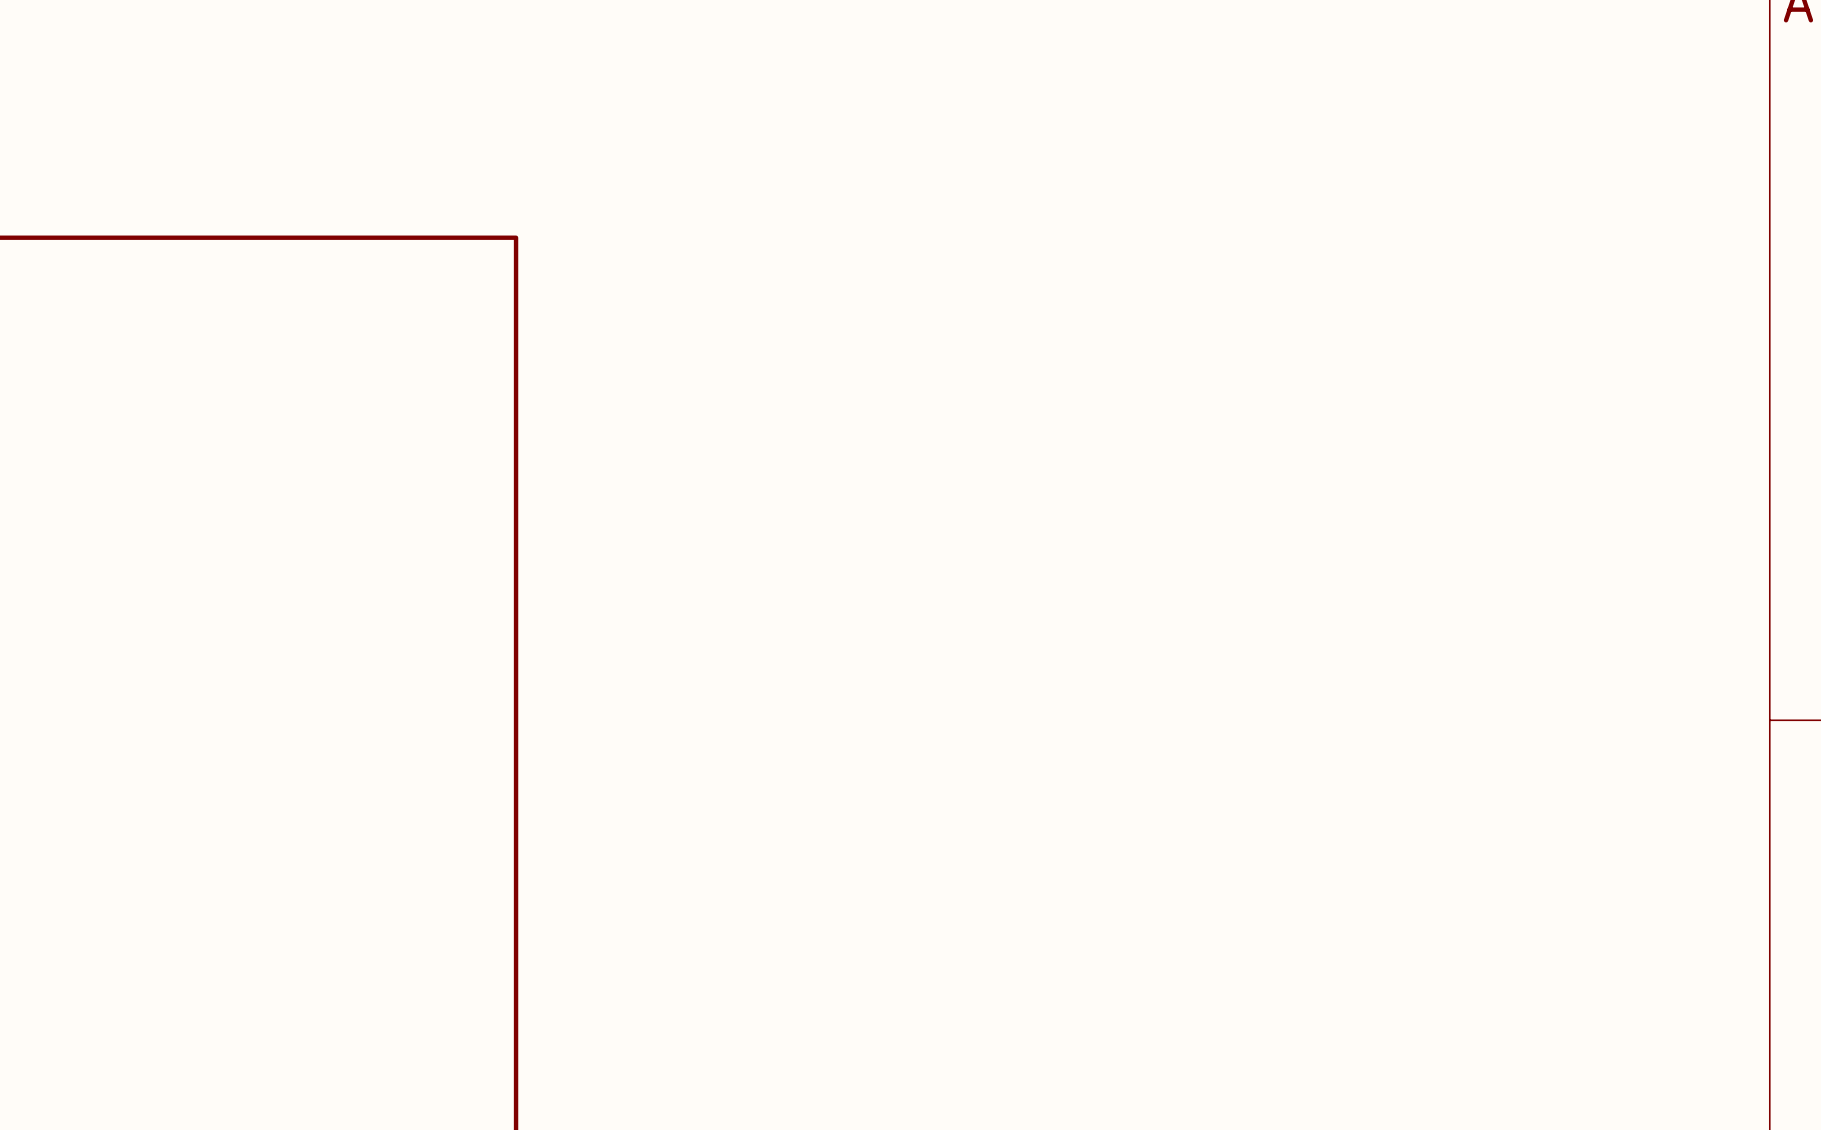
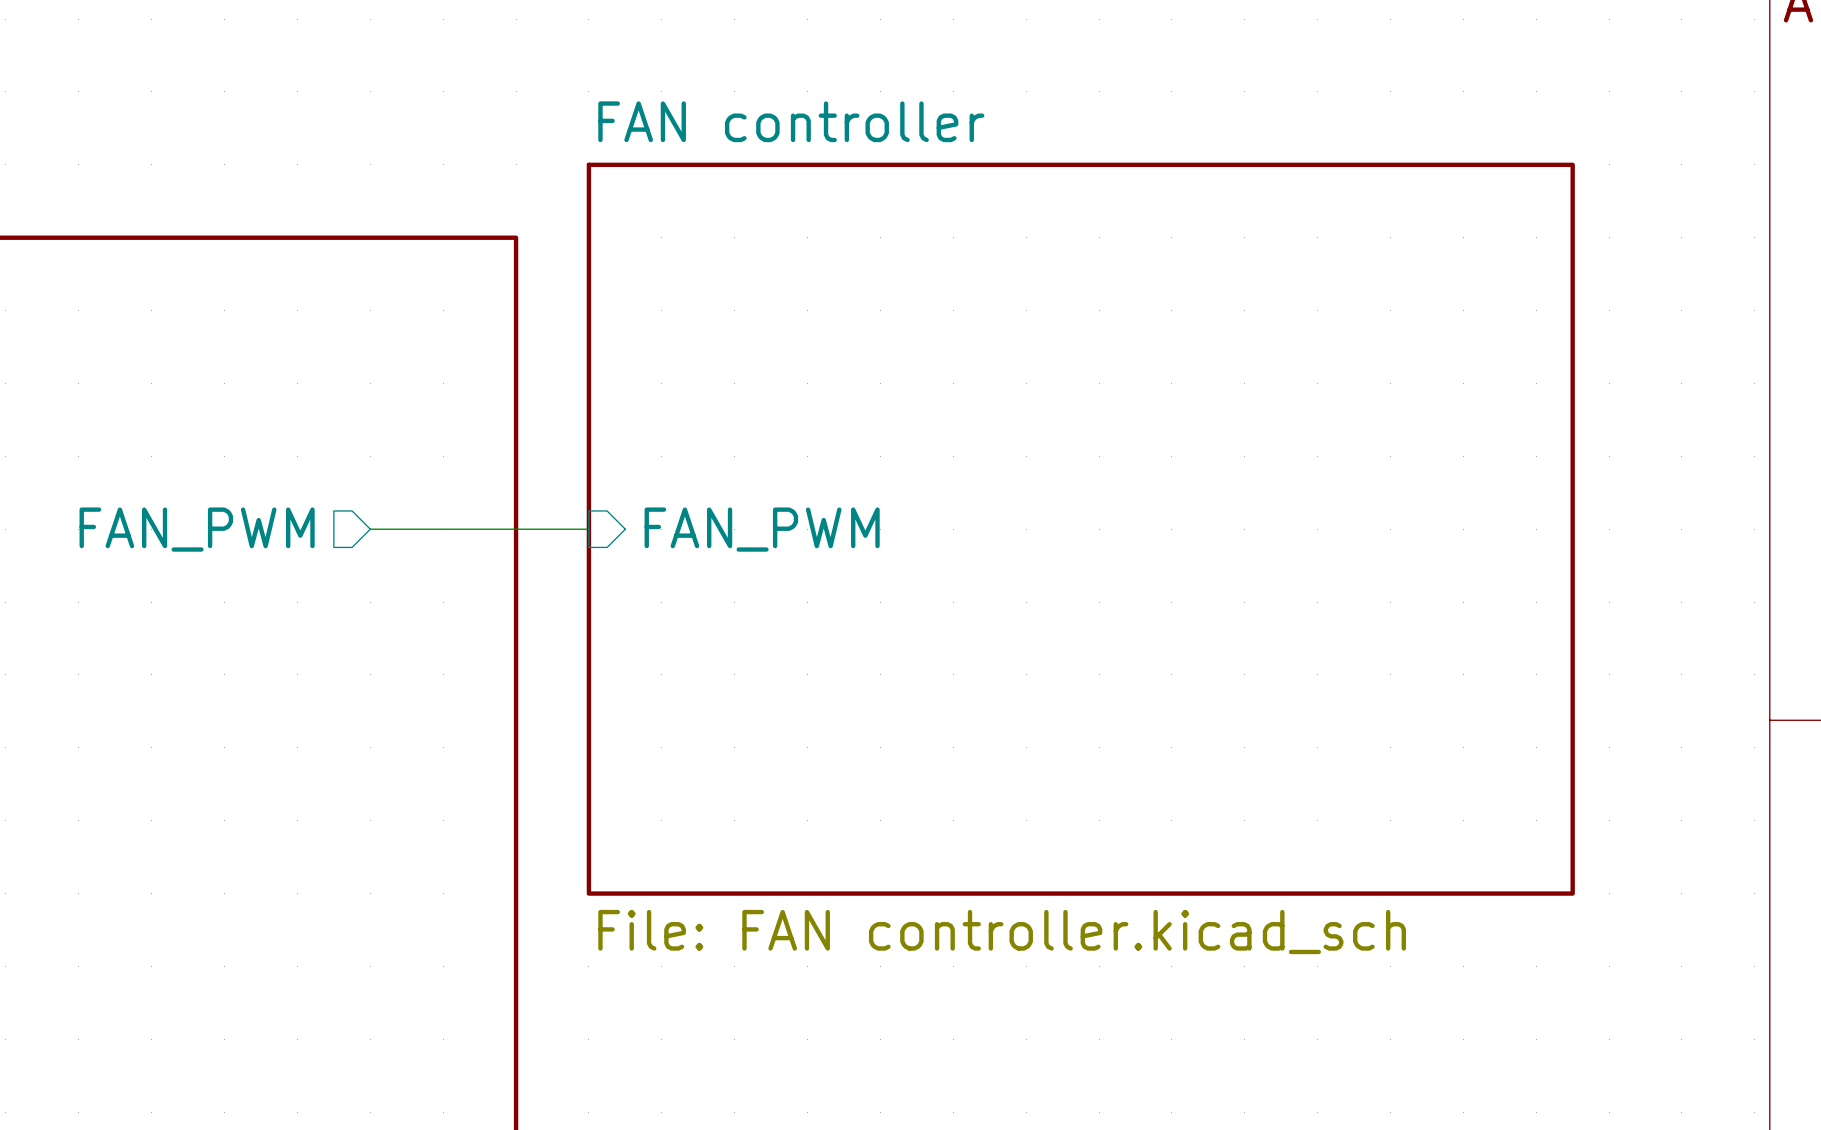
sheet pin: none -> FAN_PWM (197, 529)
wire: none -> (370, 529) (588, 529)
sheet pin: none -> FAN_PWM (762, 529)
sheet FAN controller: none -> File: FAN controller.kicad_sch (1080, 529)

